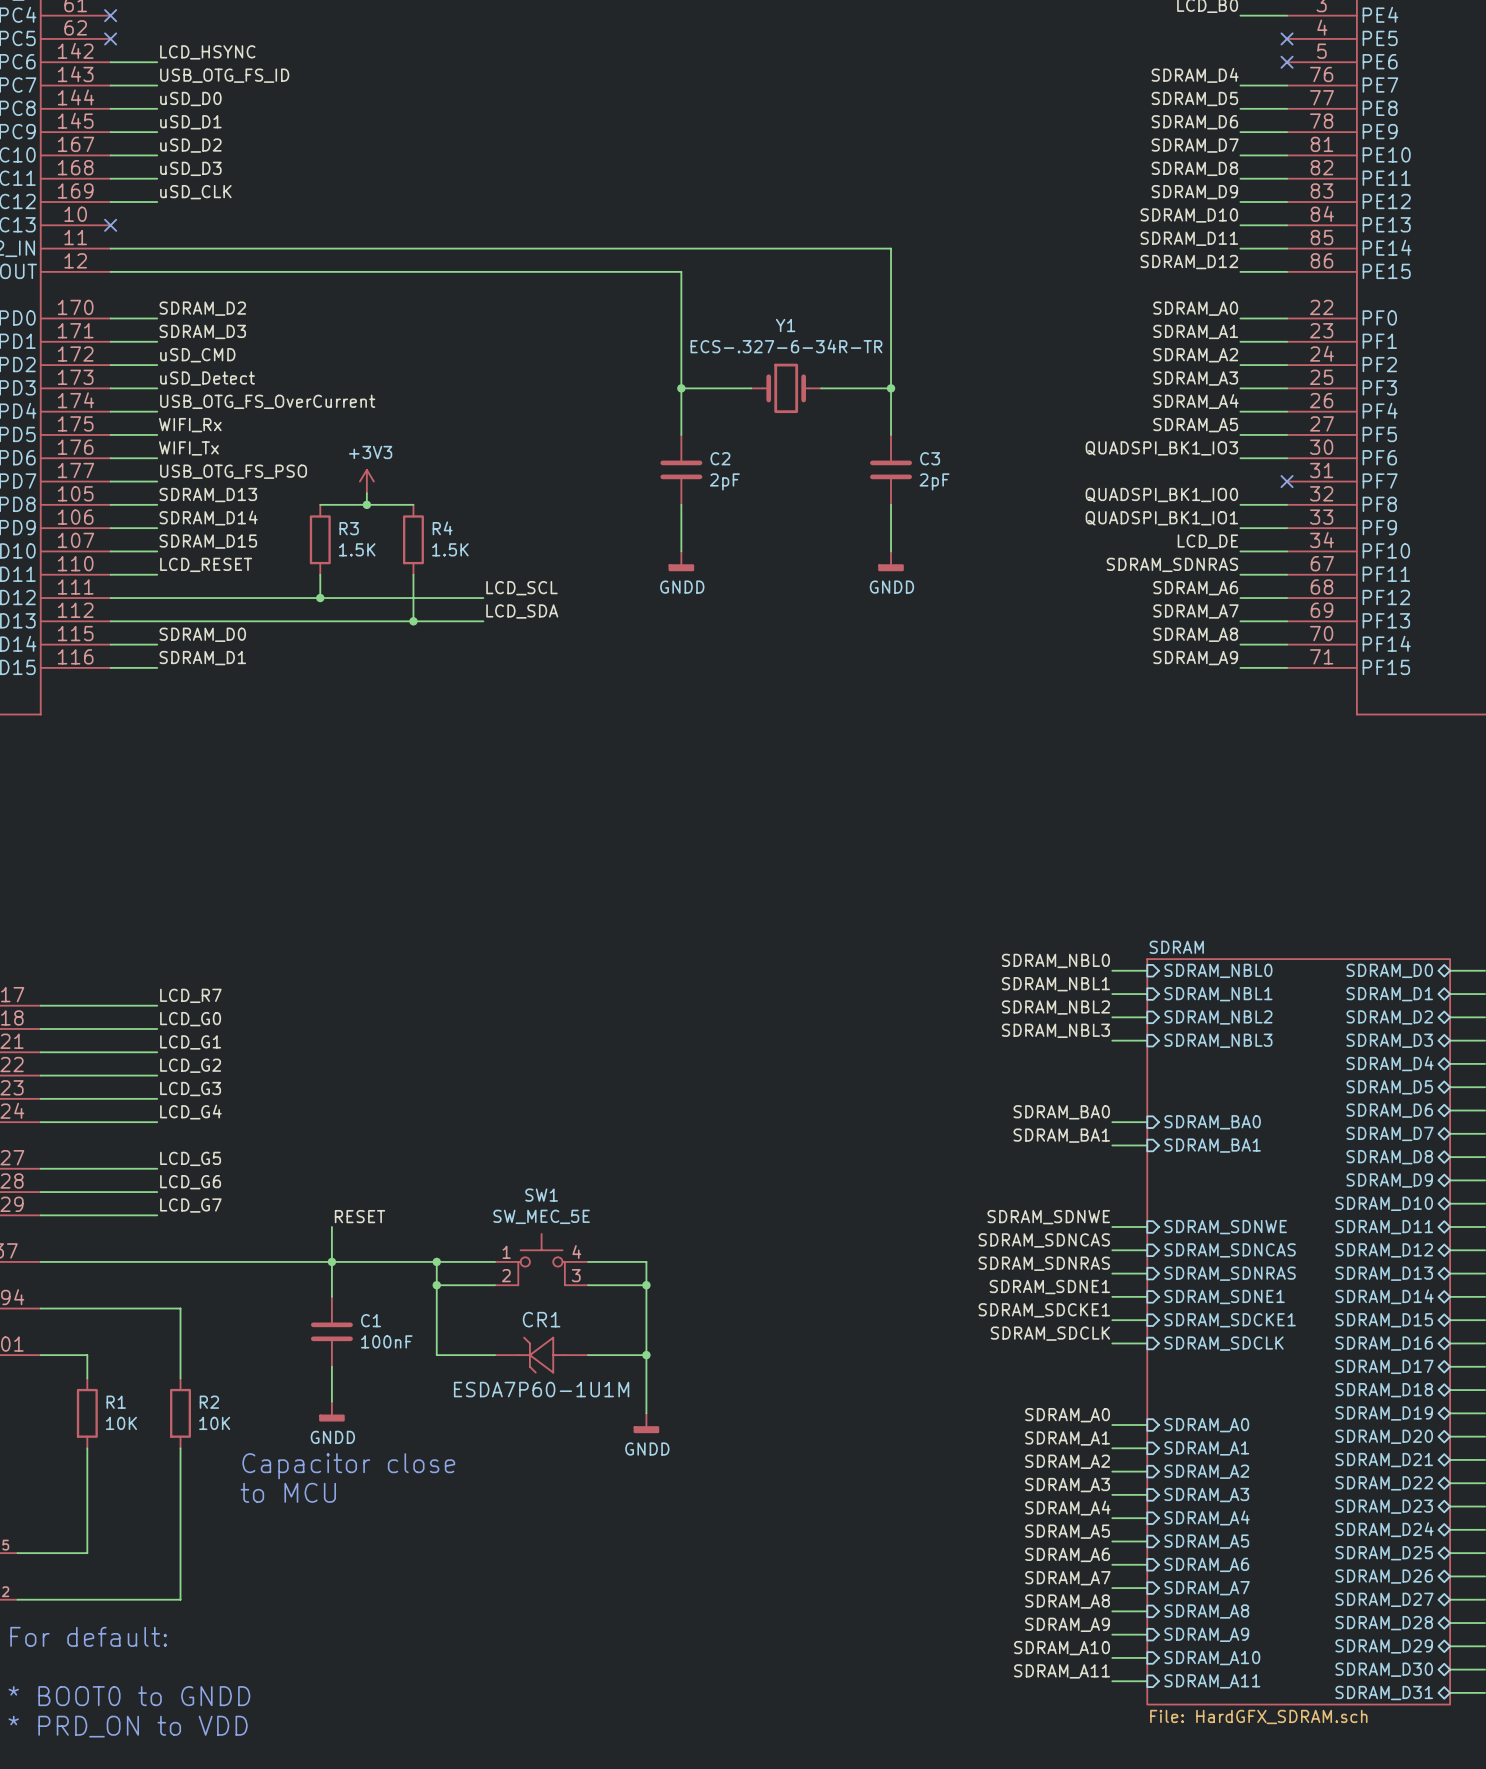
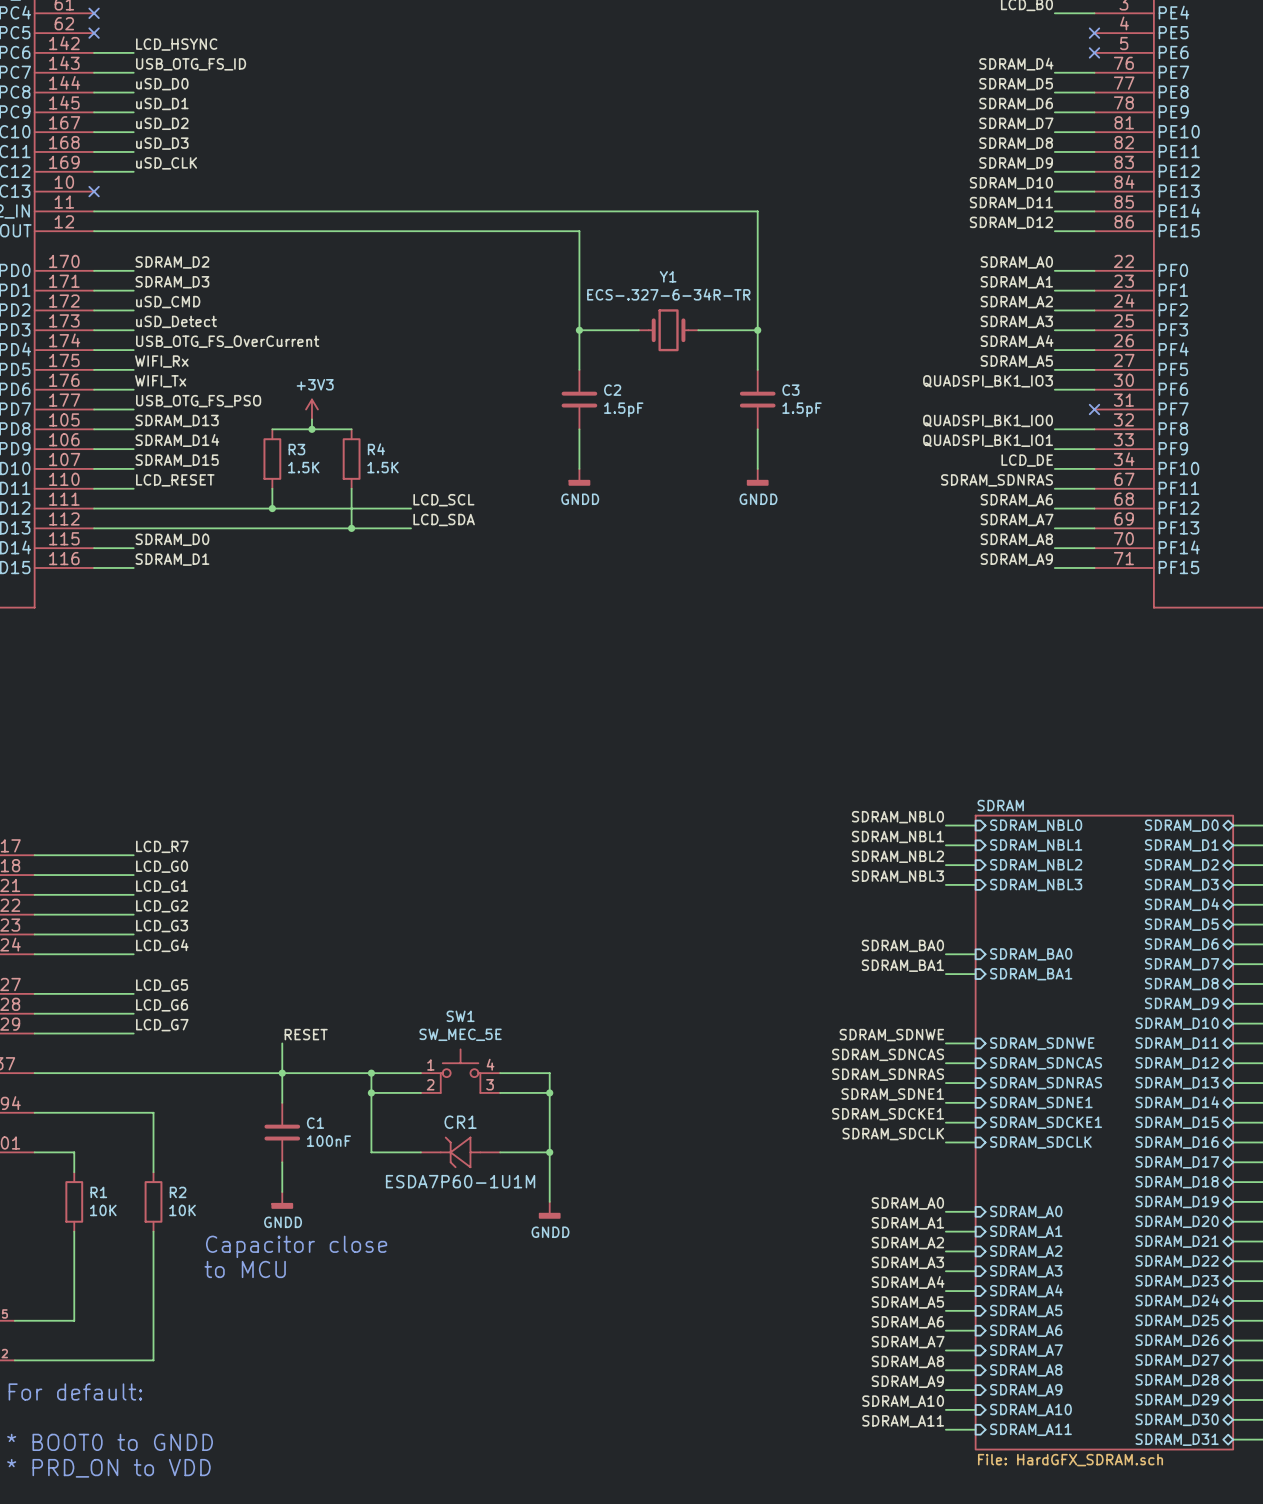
C2 value: 2pF (724, 481) -> 1.5pF (623, 409)
C3 value: 2pF (934, 481) -> 1.5pF (802, 409)

